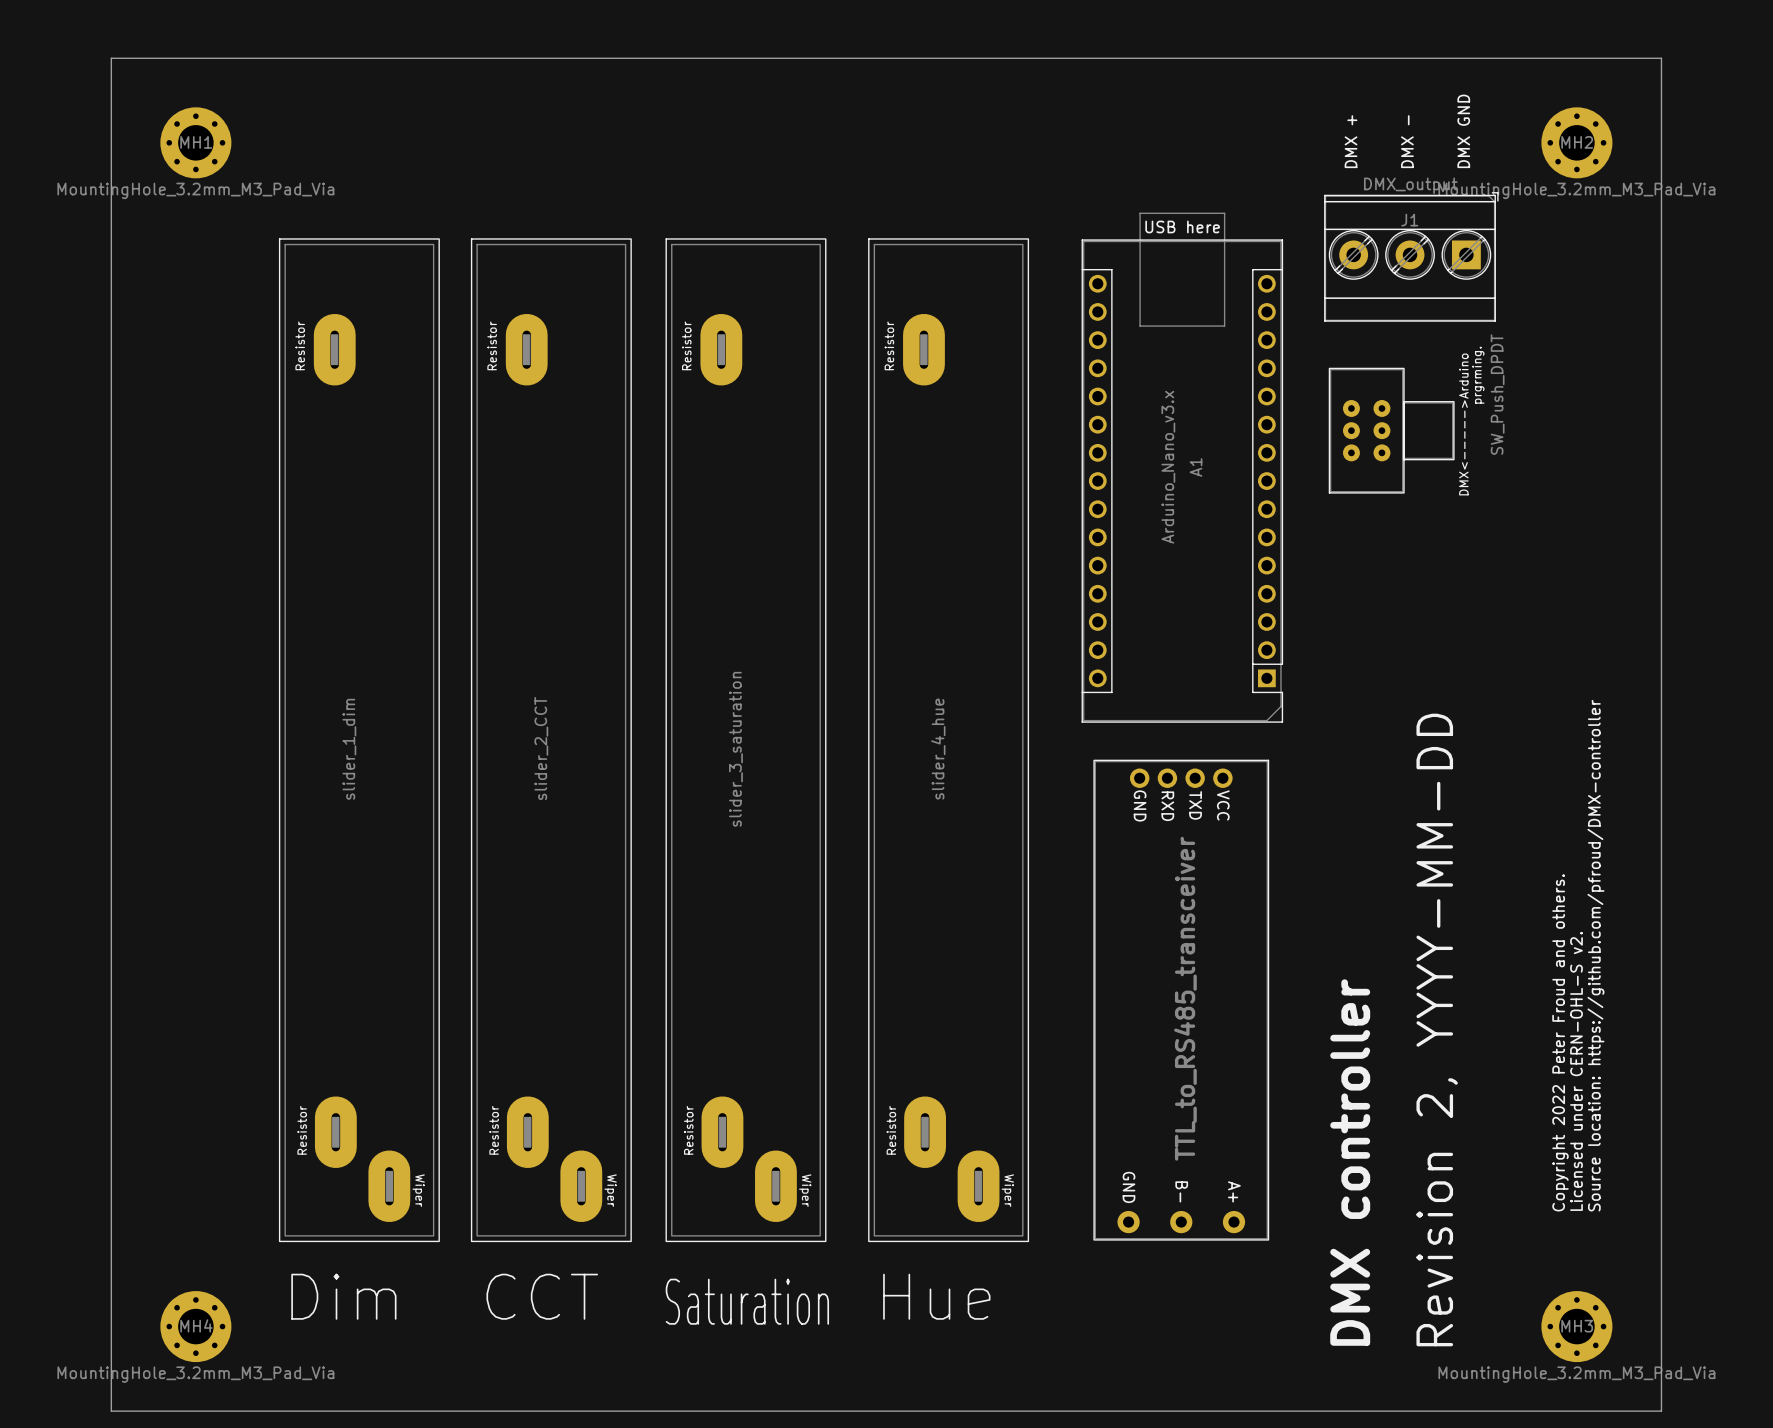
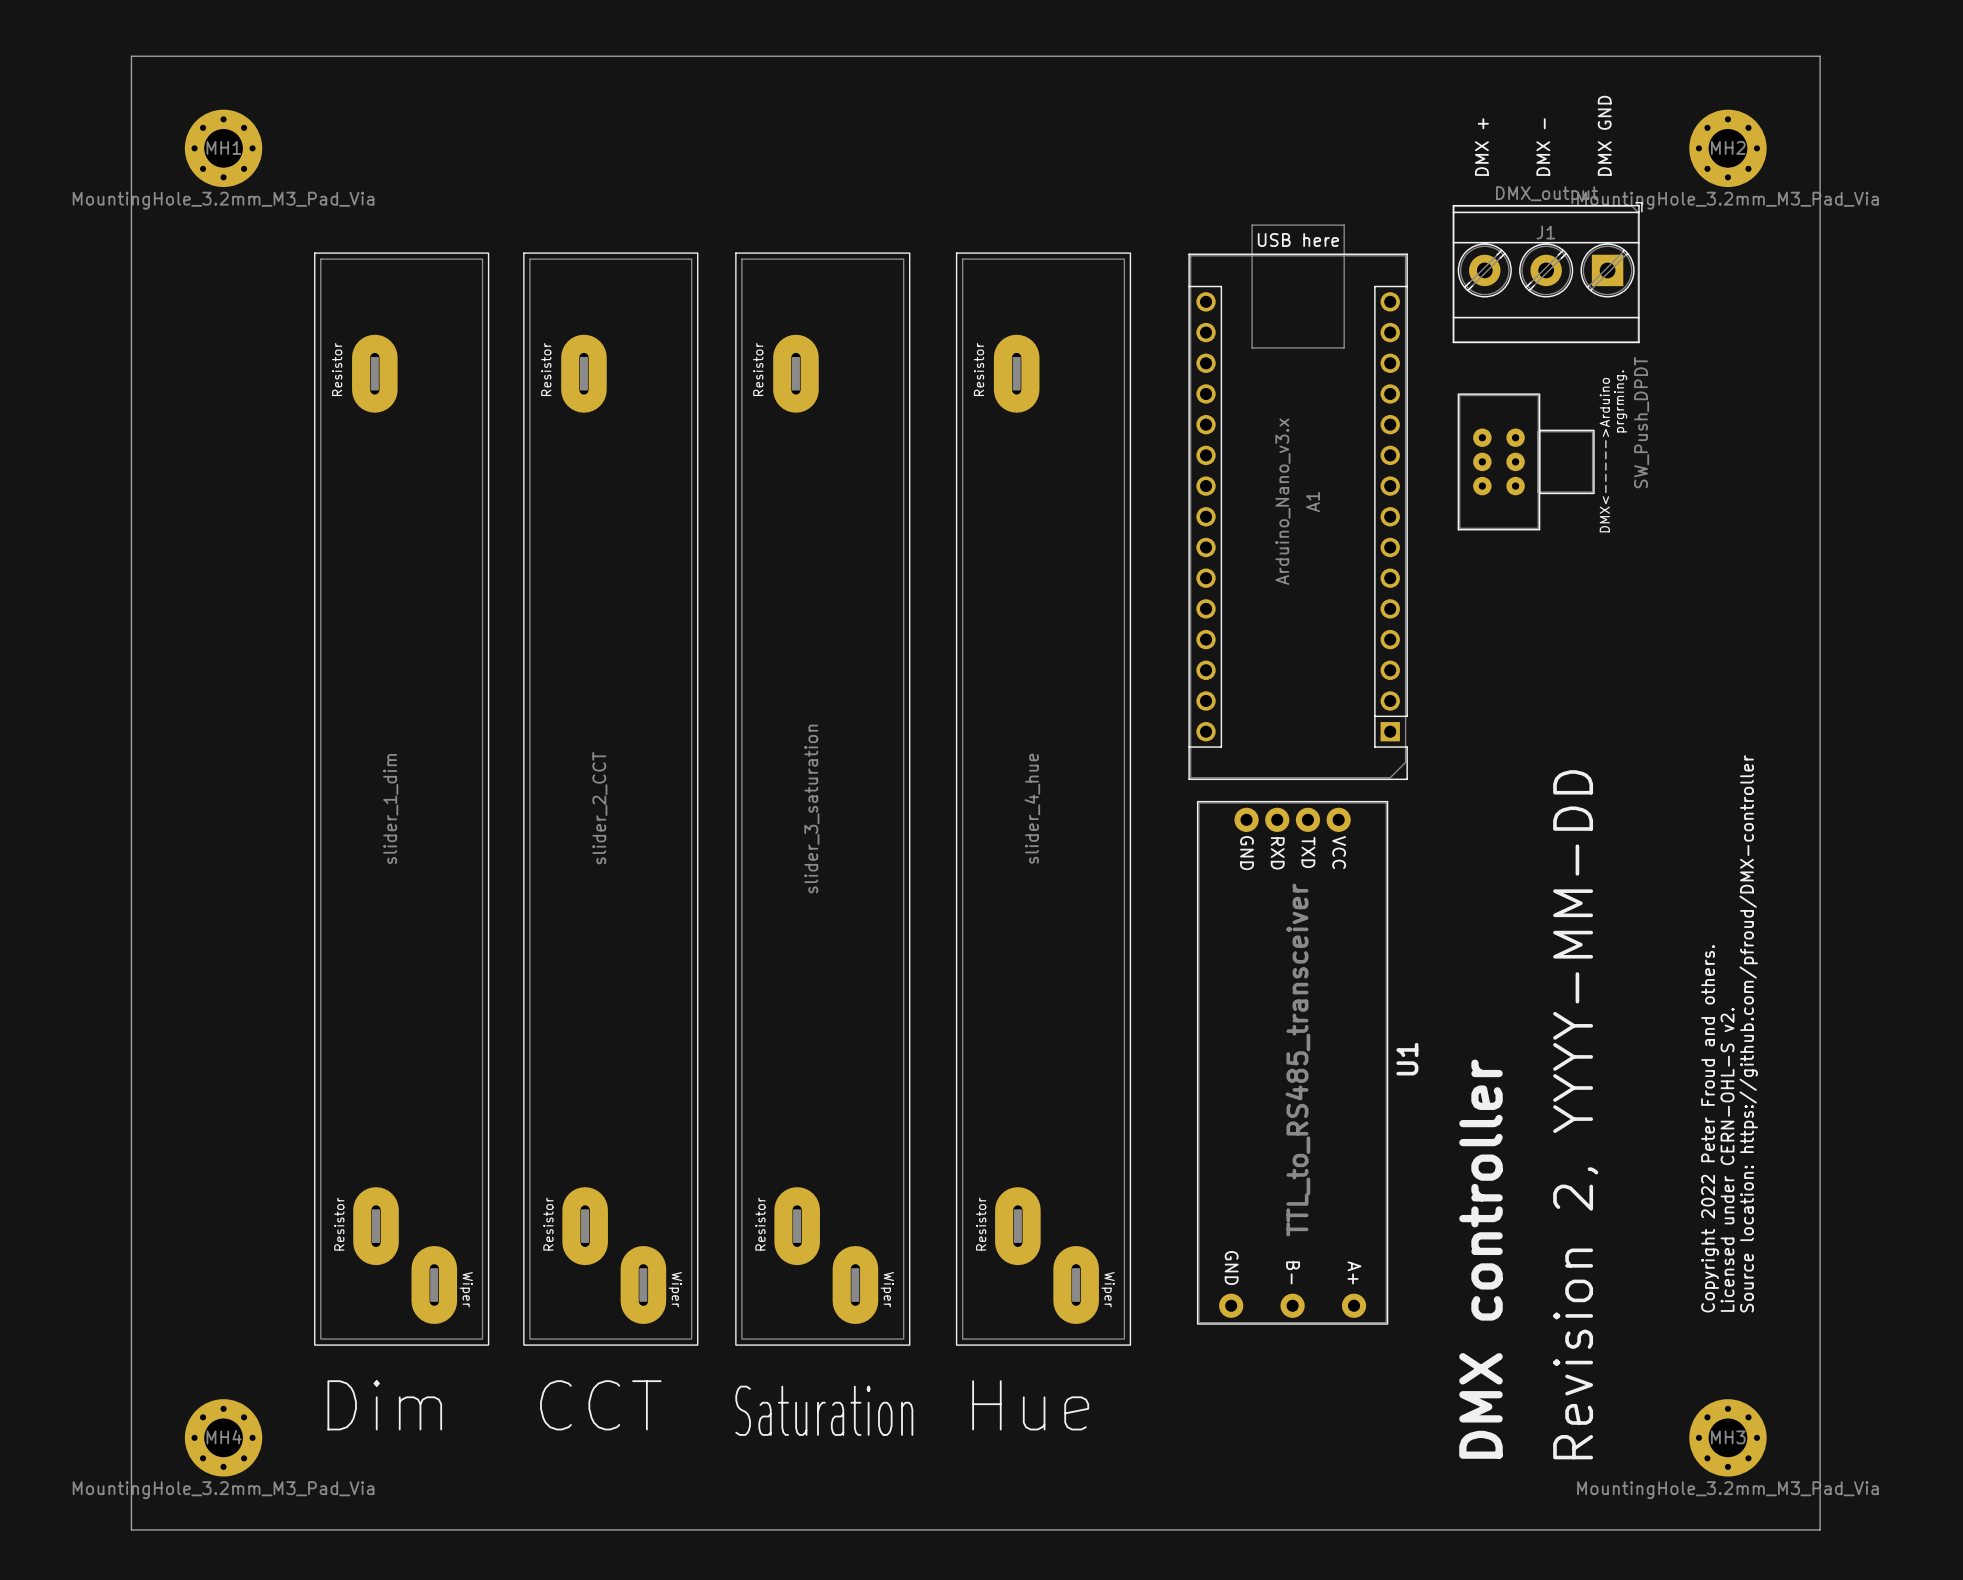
U1: none -> TTL_to_RS485_transceiver (1292, 1062)
part: TTL_to_RS485_transceiver (1181, 1000) -> none

